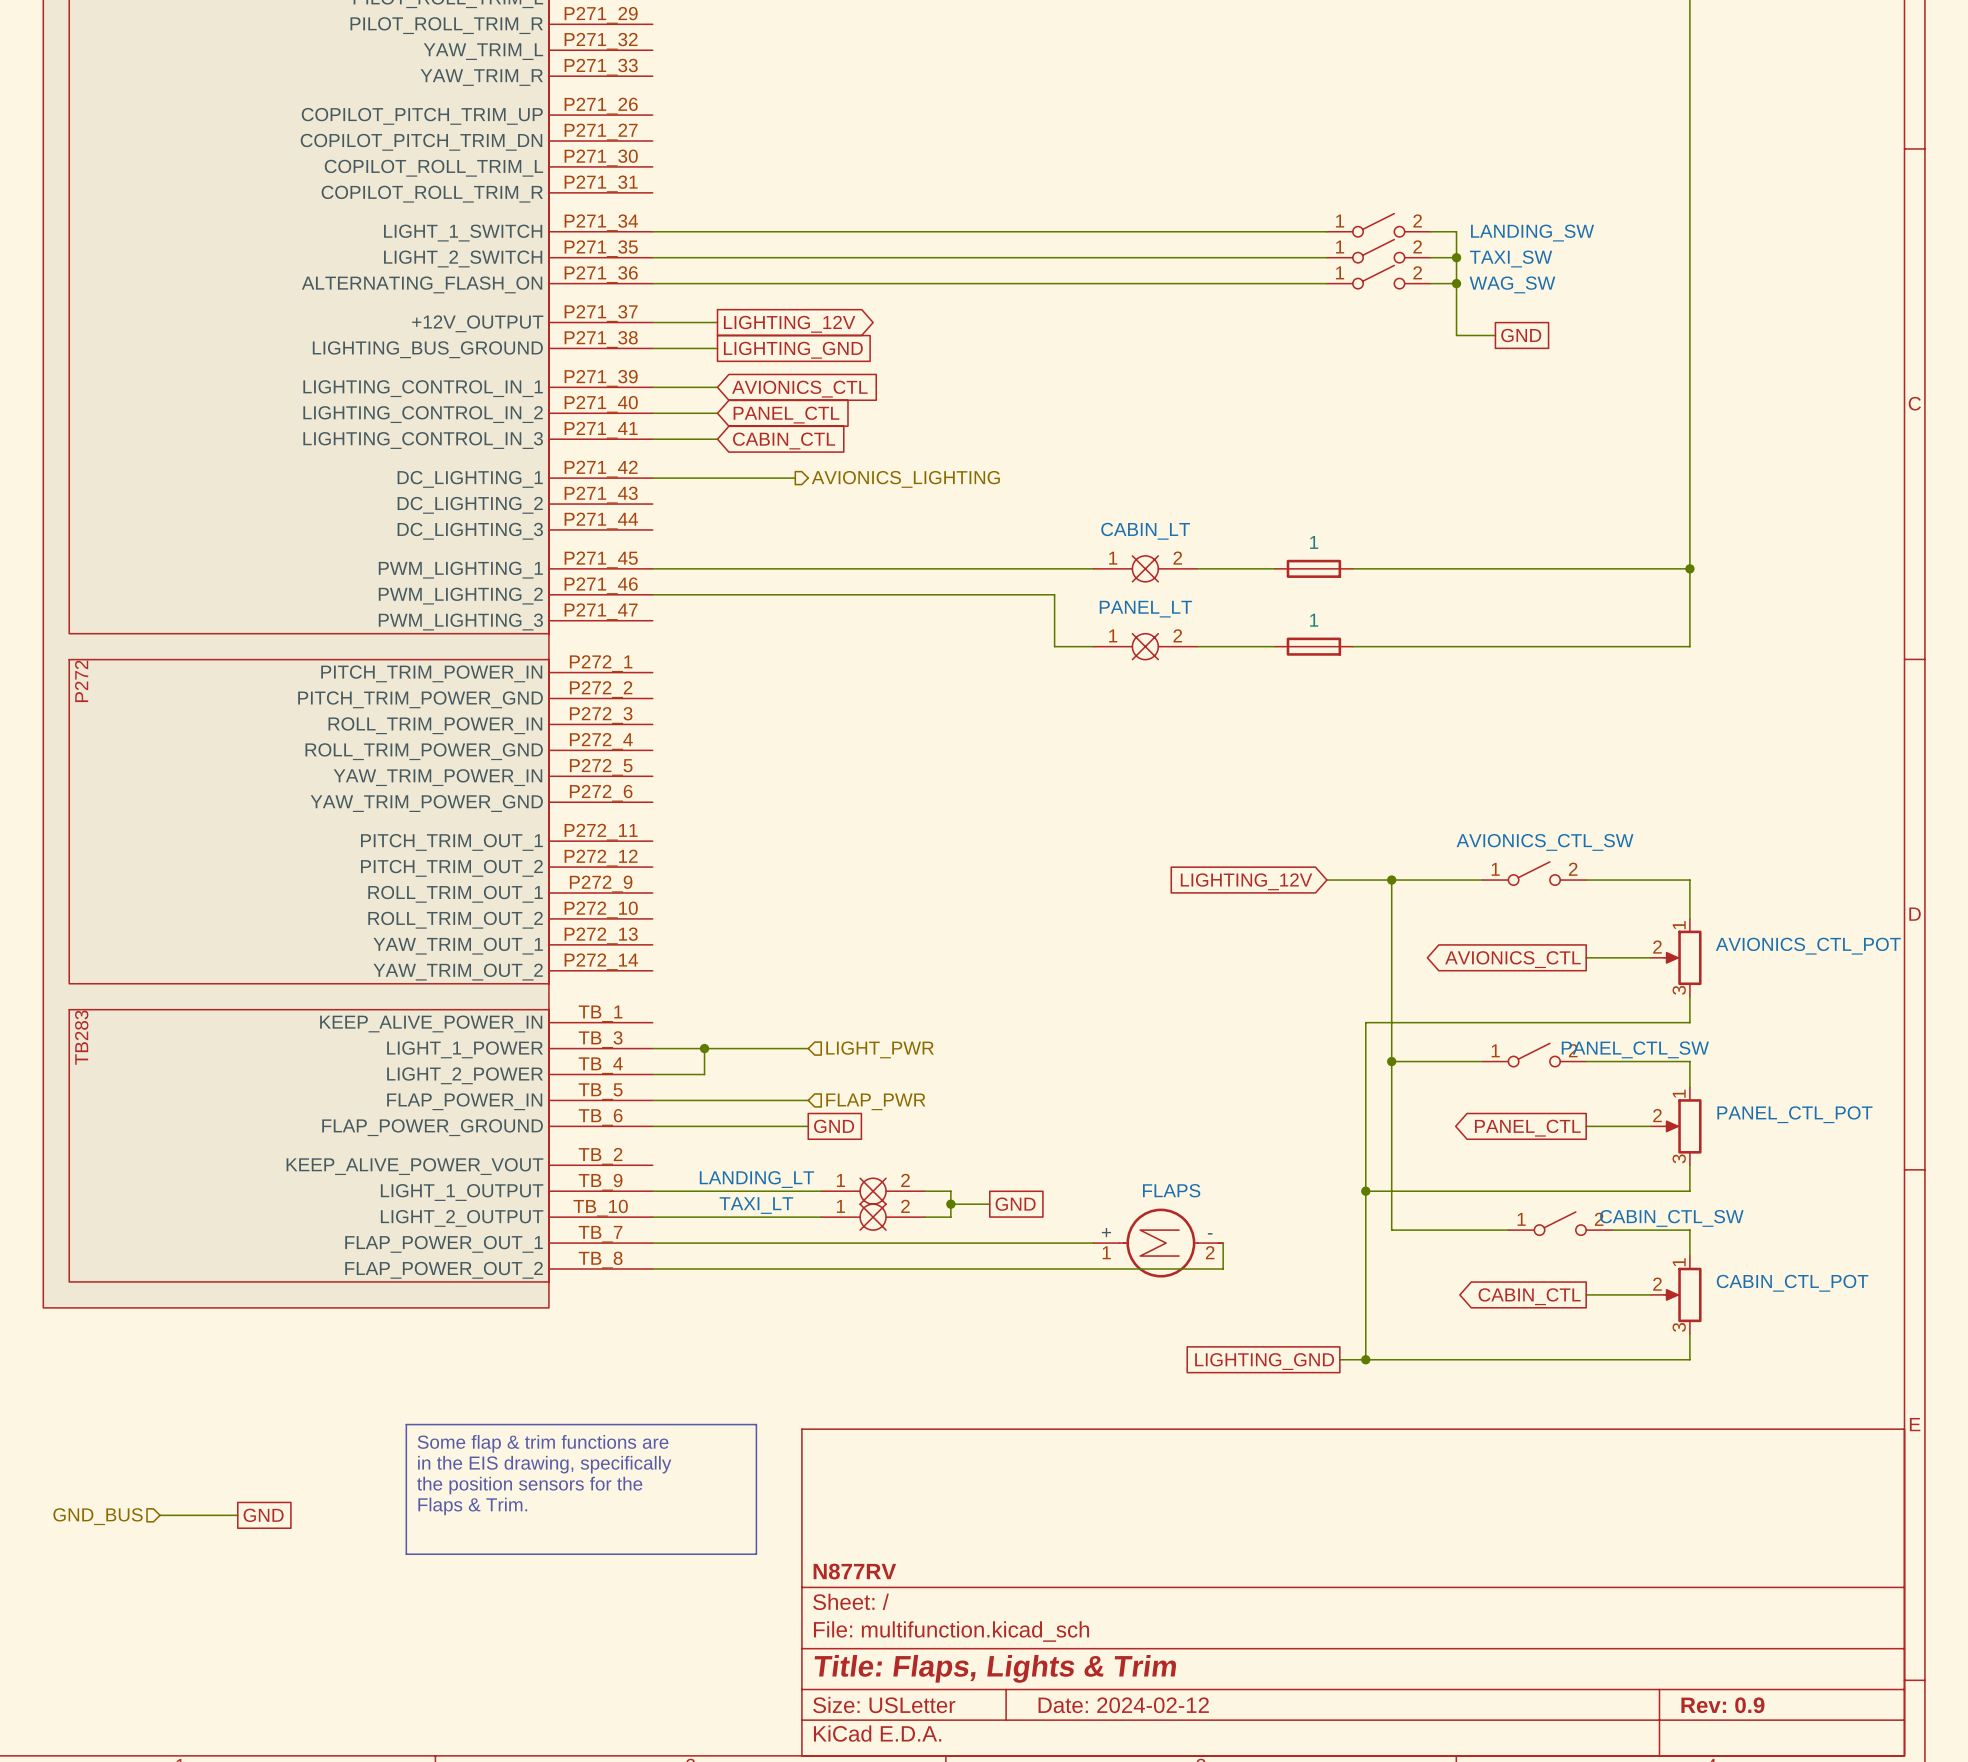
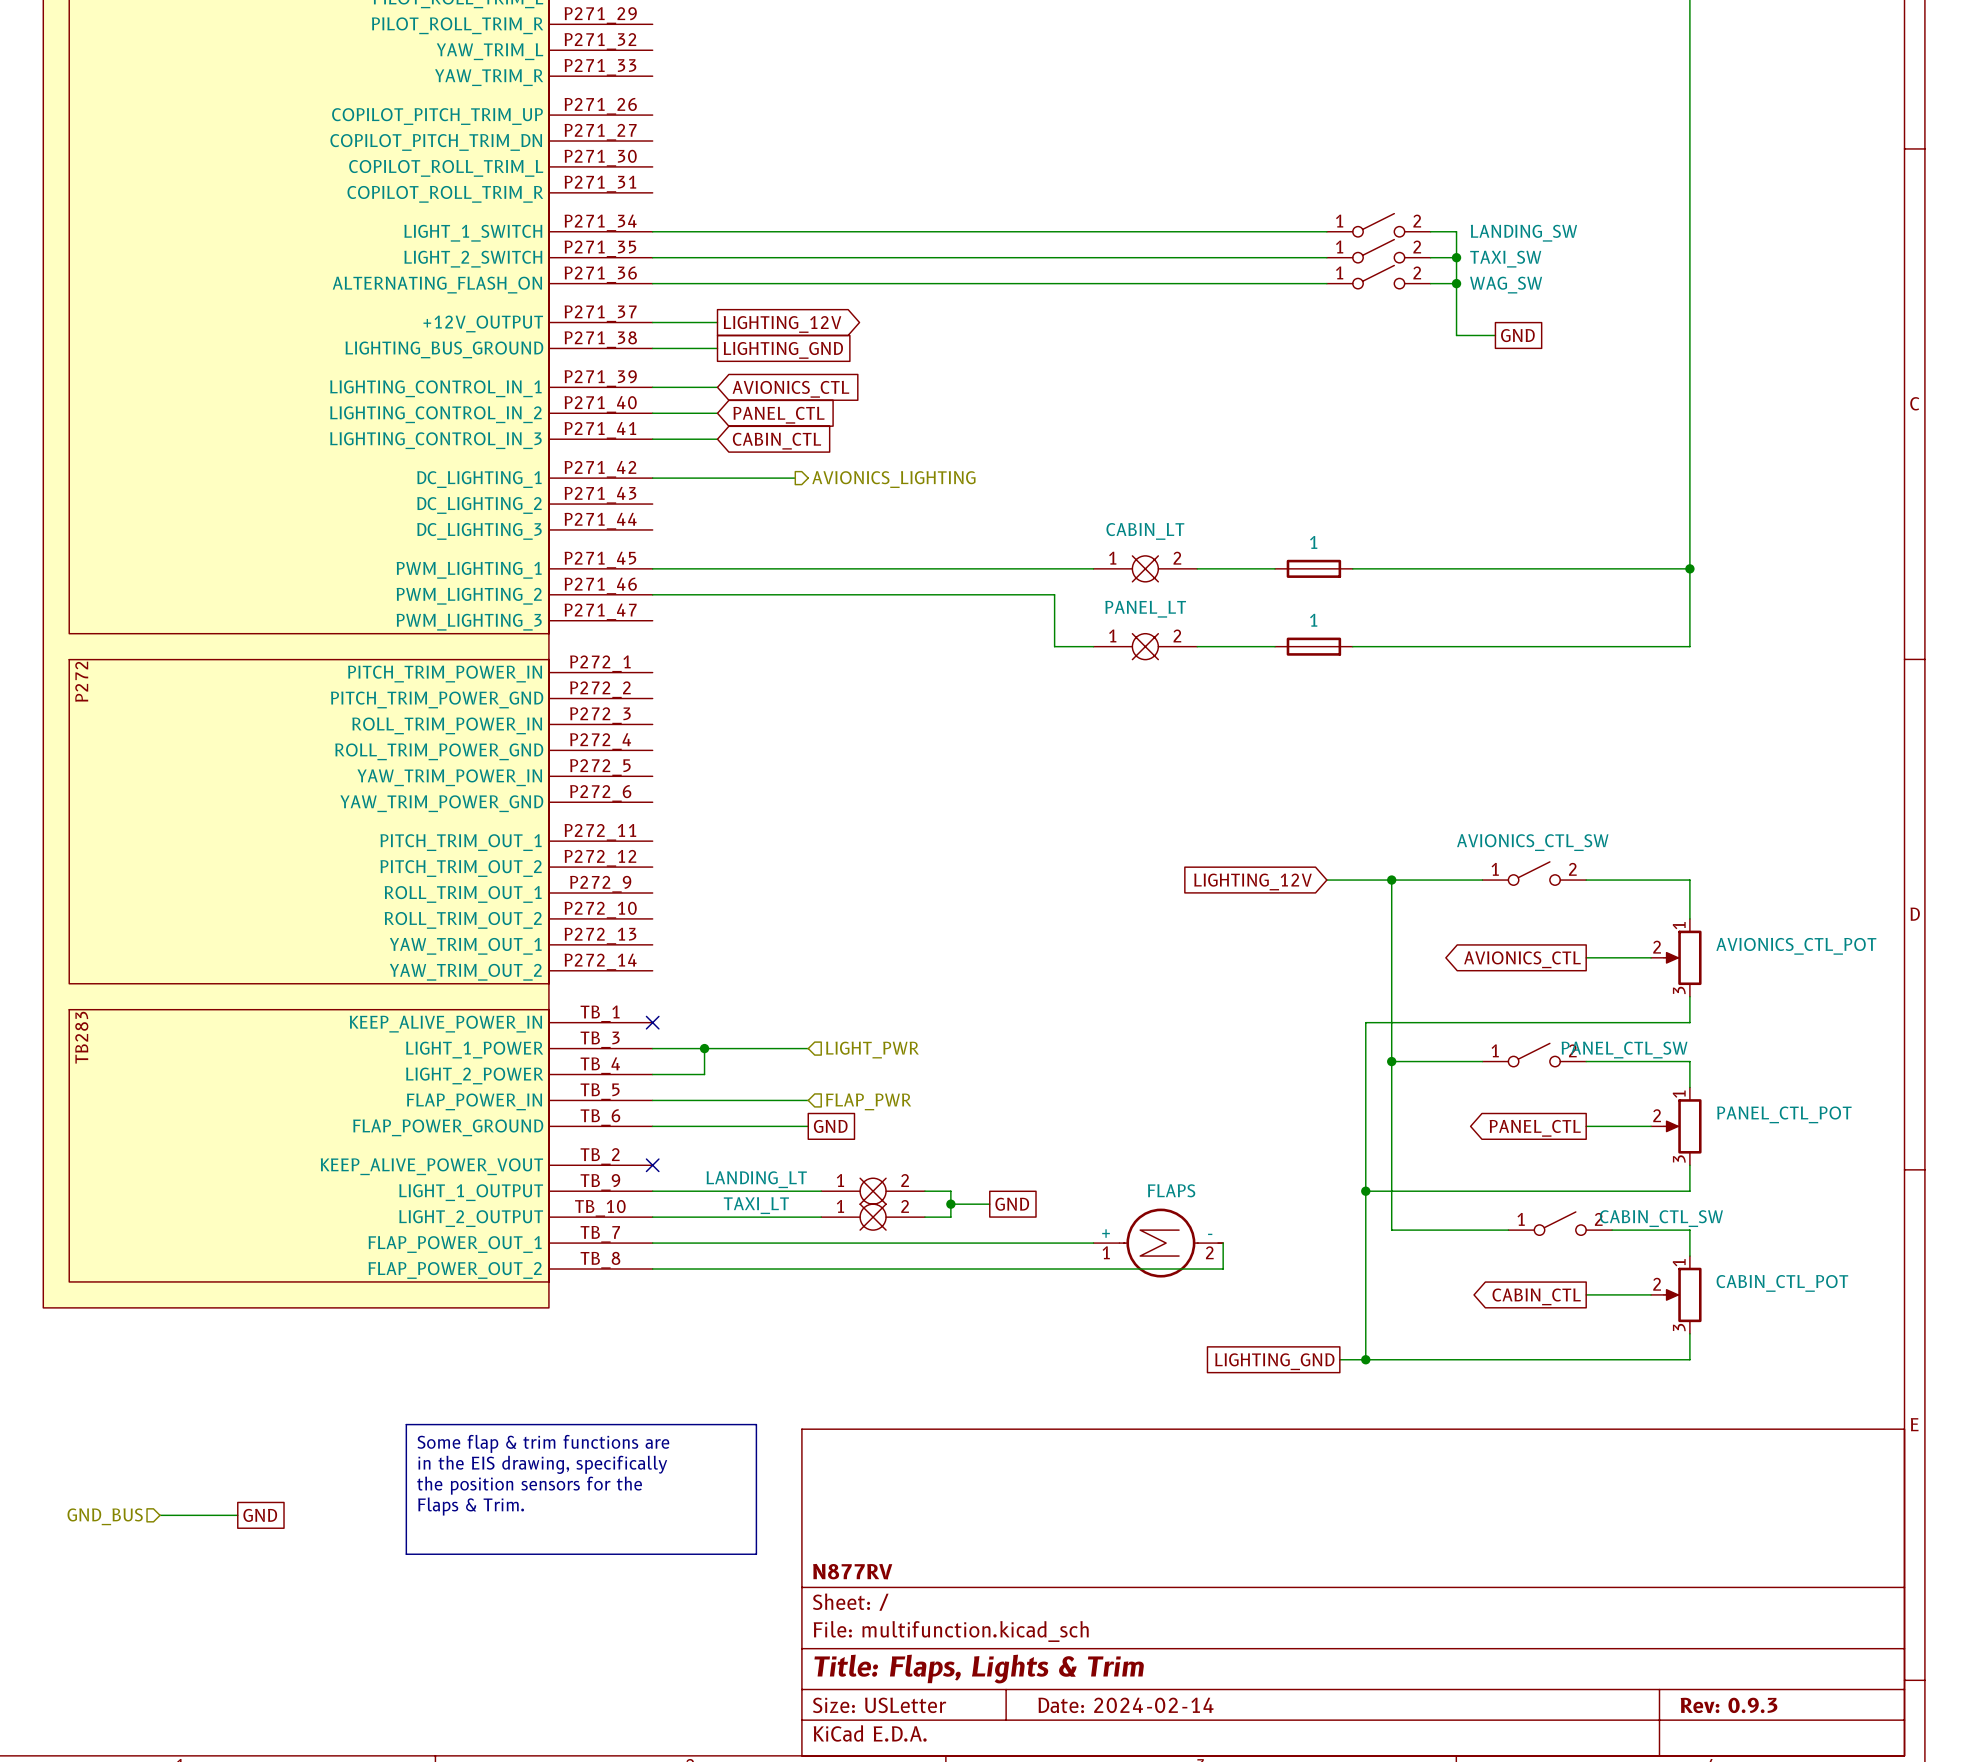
no-connect mark: none -> (652, 1022)
no-connect mark: none -> (652, 1165)
title block: Date: 2024-02-12 (1123, 1705) -> Date: 2024-02-14 (1126, 1705)
title block: Rev: 0.9 (1722, 1705) -> Rev: 0.9.3 (1729, 1705)

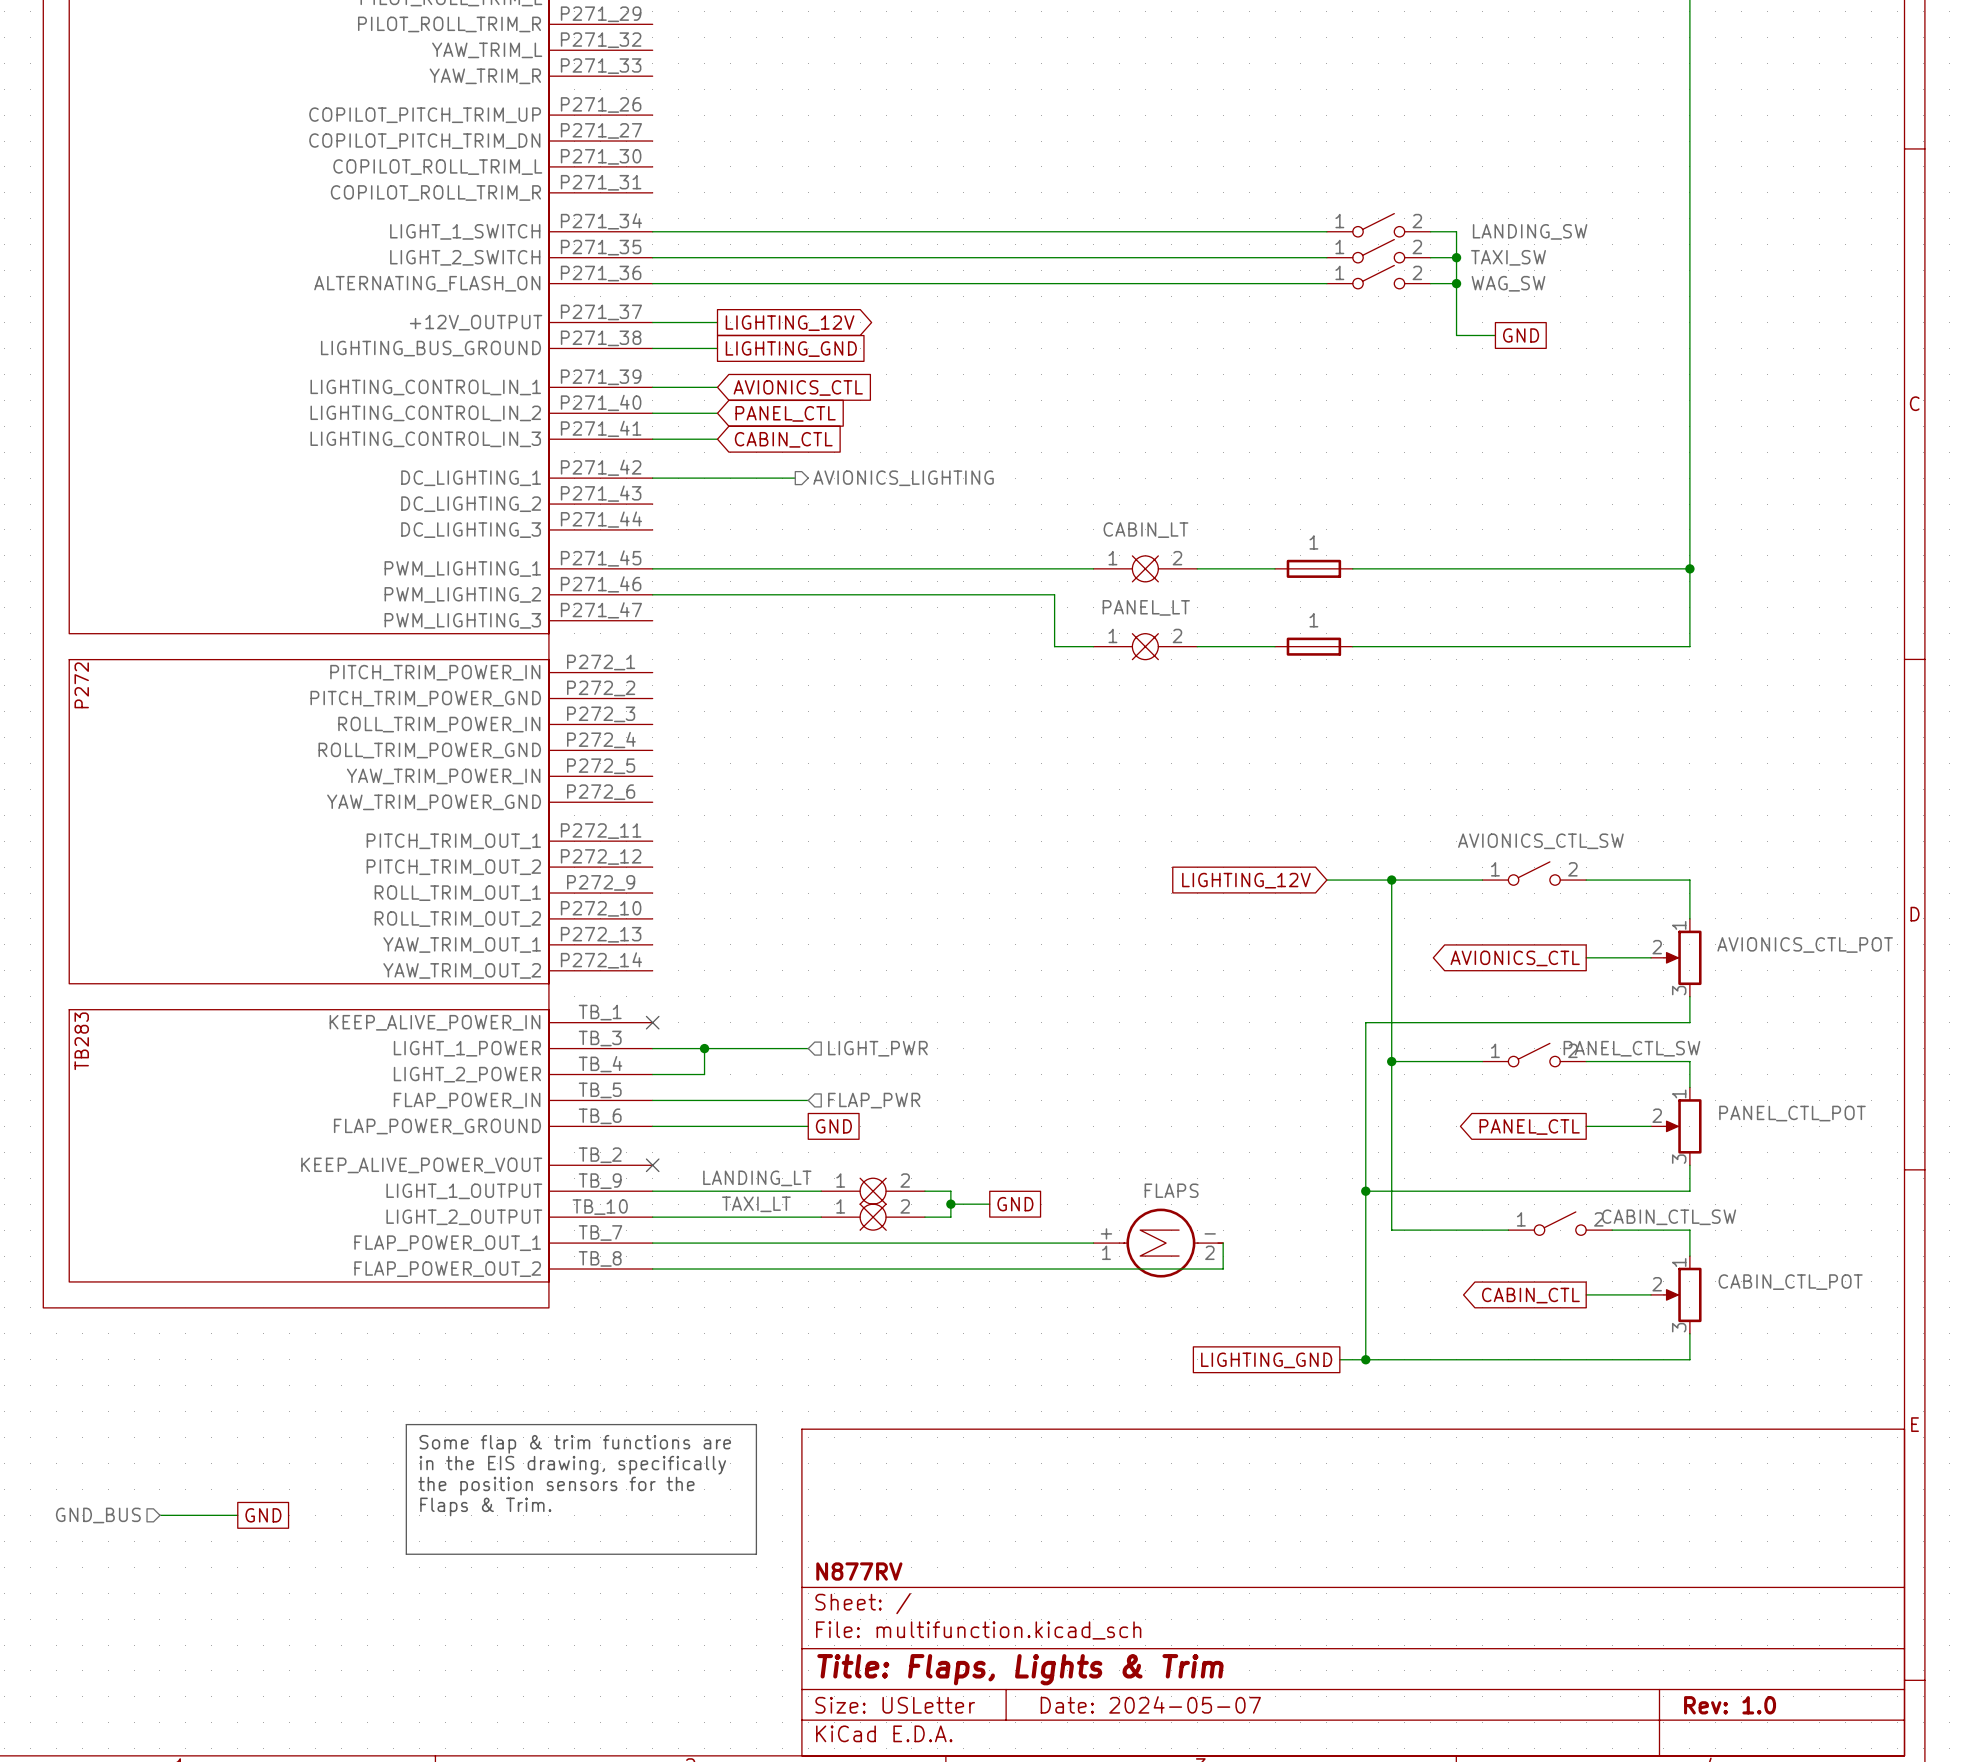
title block: Date: 2024-02-14 (1126, 1705) -> Date: 2024-05-07 (1150, 1704)
title block: Rev: 0.9.3 (1729, 1705) -> Rev: 1.0 (1730, 1705)

